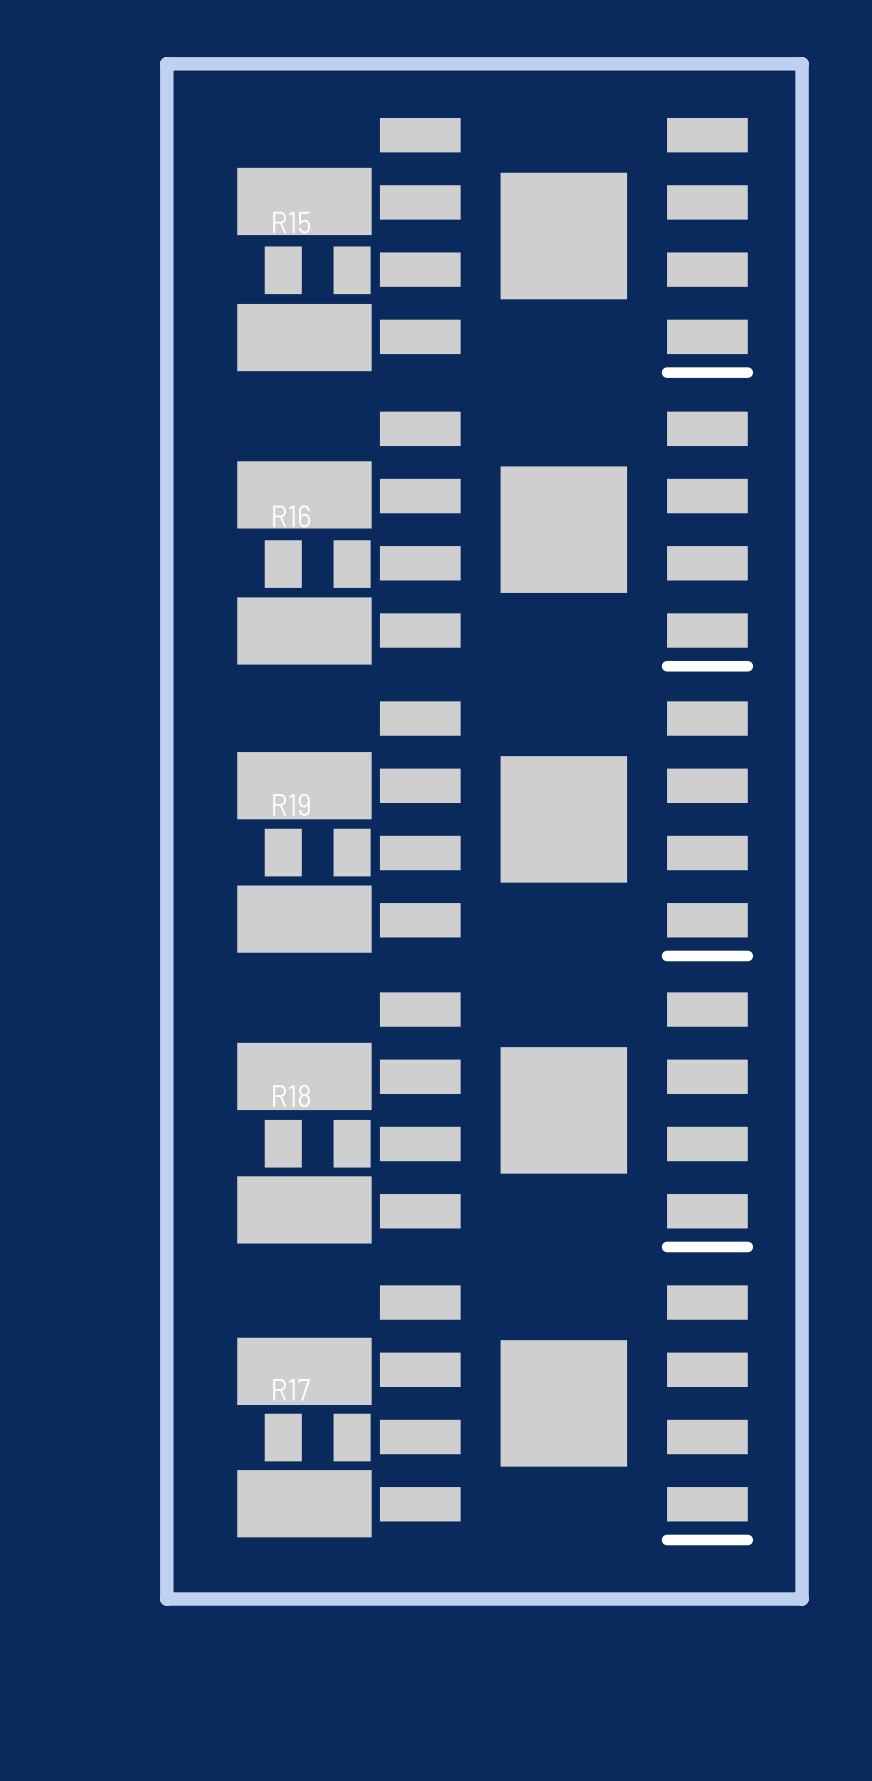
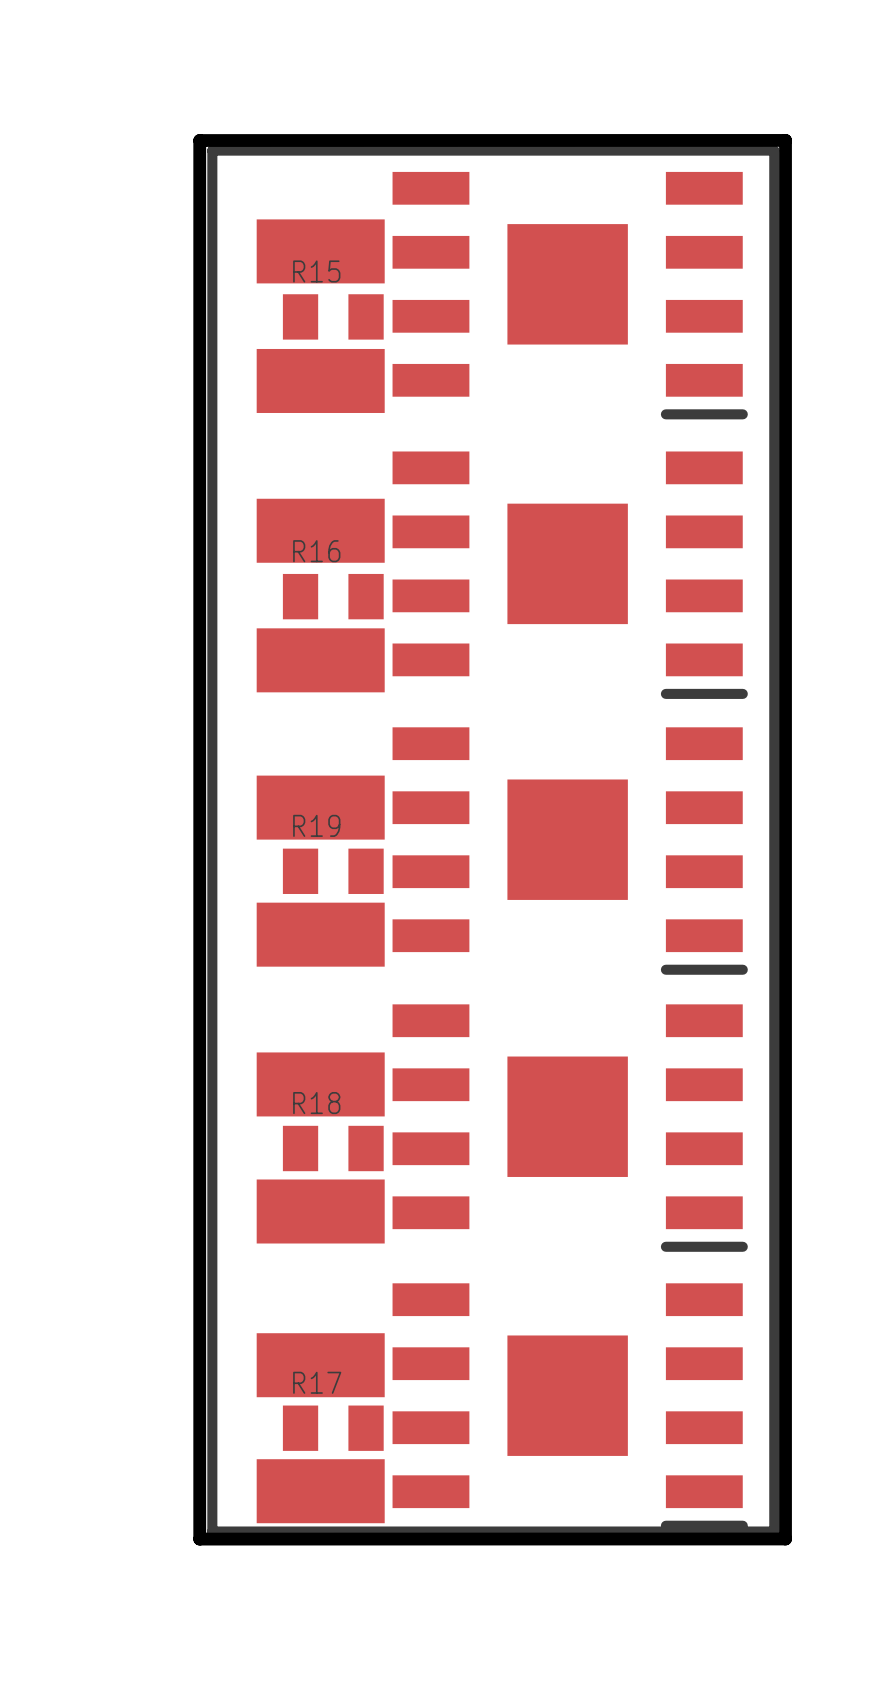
board edge: (166, 63) (802, 63) (802, 1599) (166, 1599) (166, 63) -> (199, 140) (199, 1539) (785, 1538) (785, 140) (199, 140)
line: none -> (212, 150) (212, 1531) (774, 1531) (774, 150) (212, 150)

